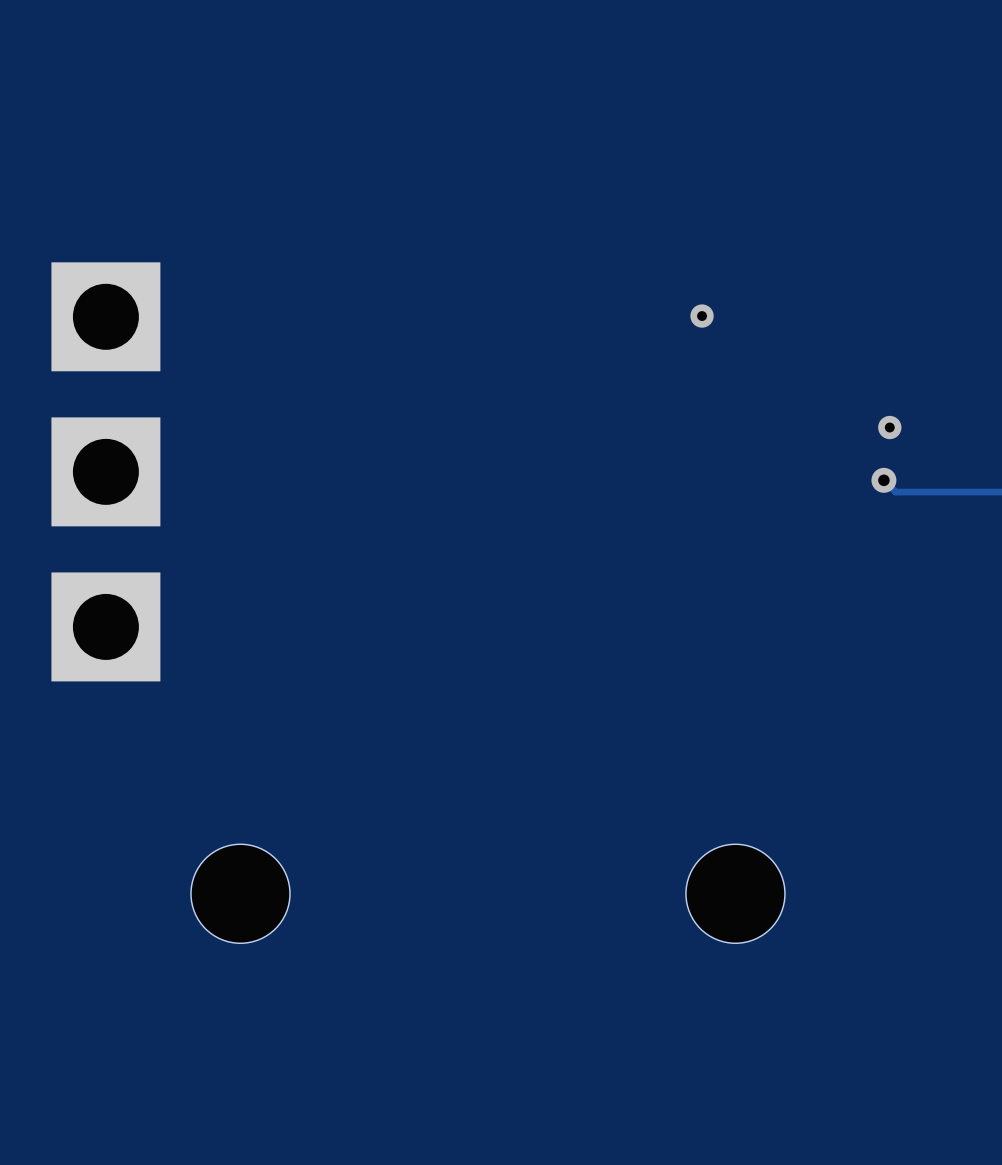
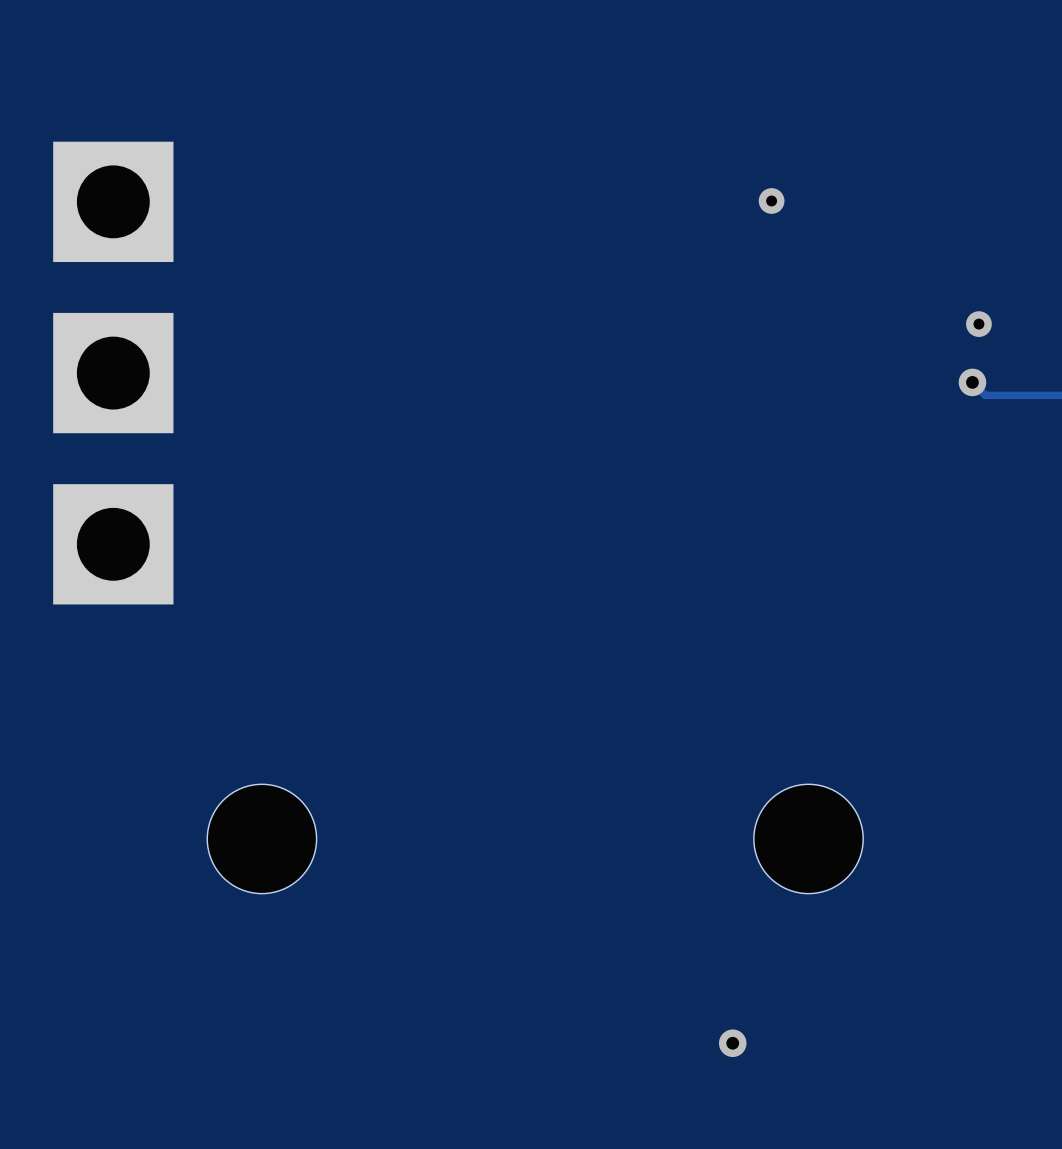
via: none -> (732, 1043)

